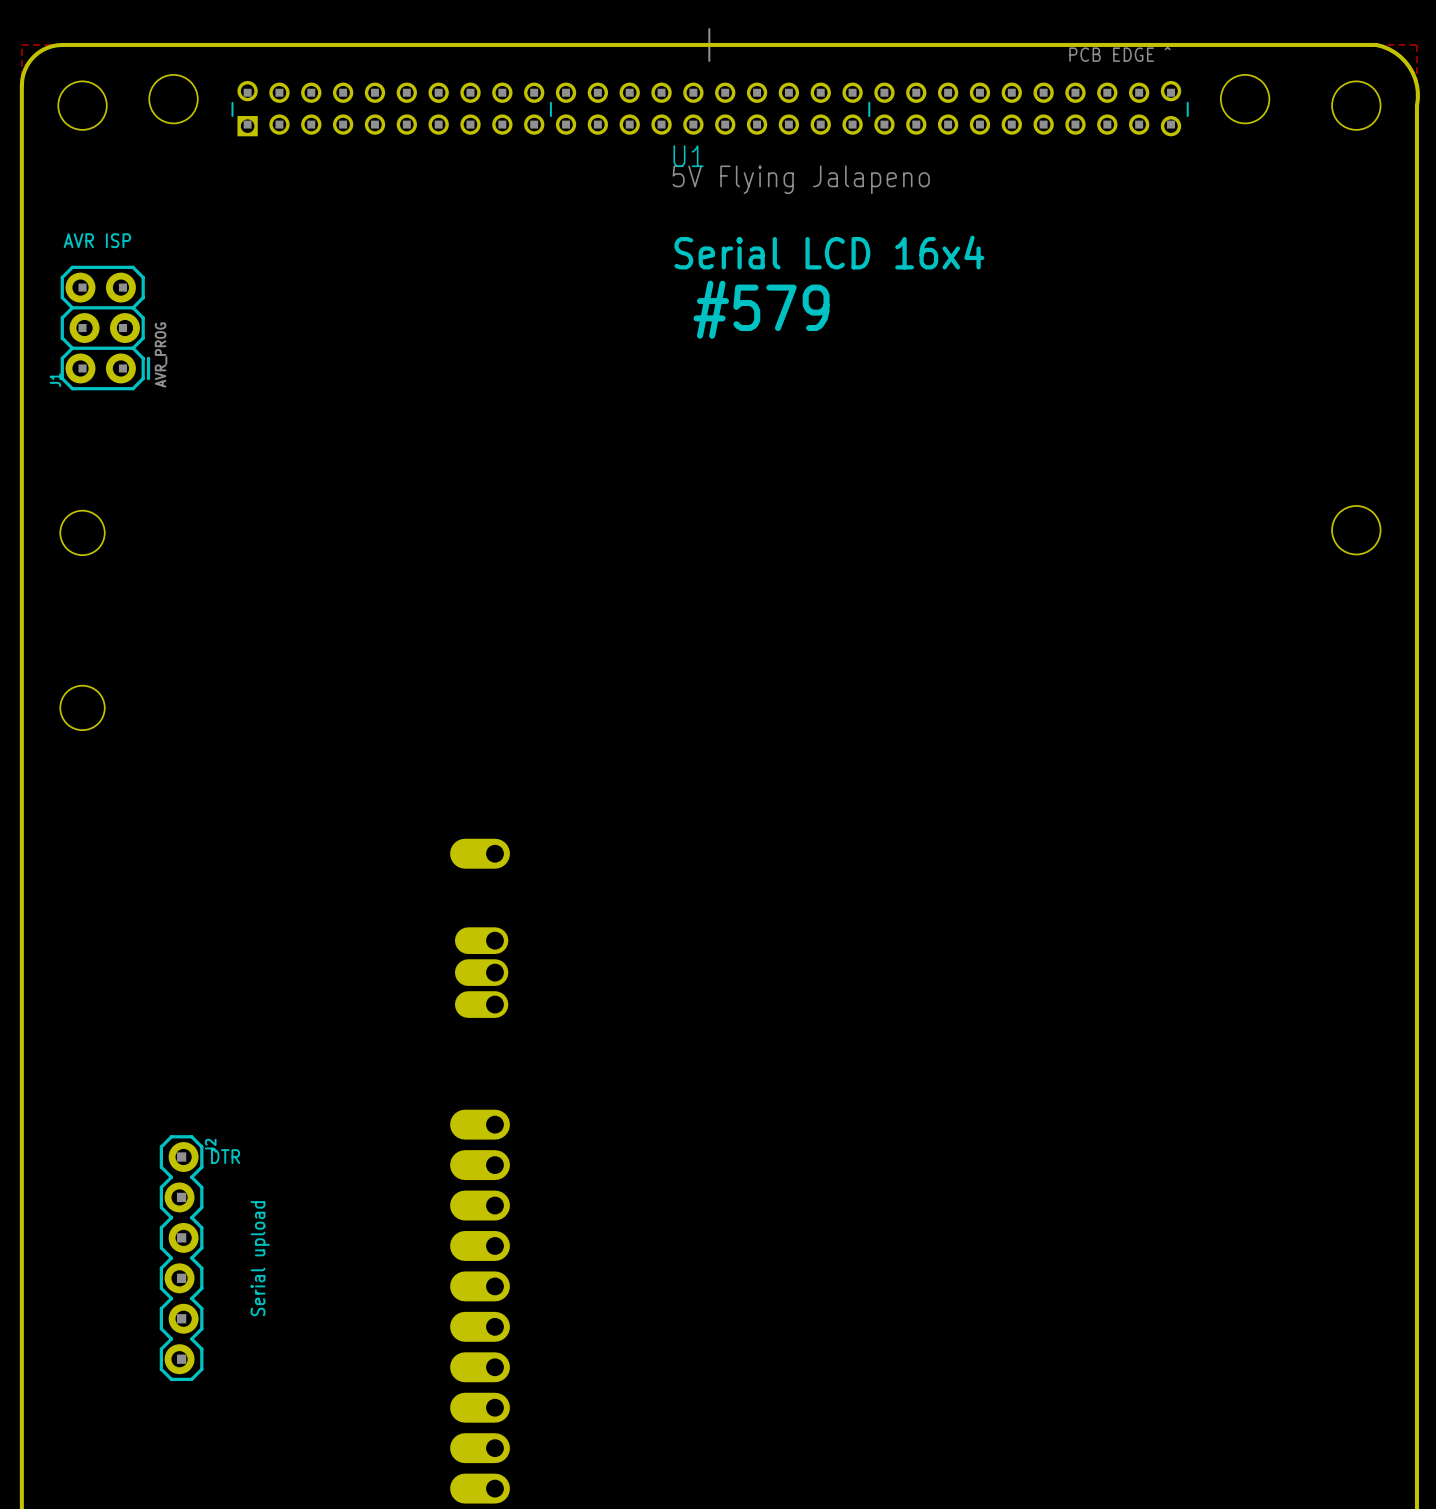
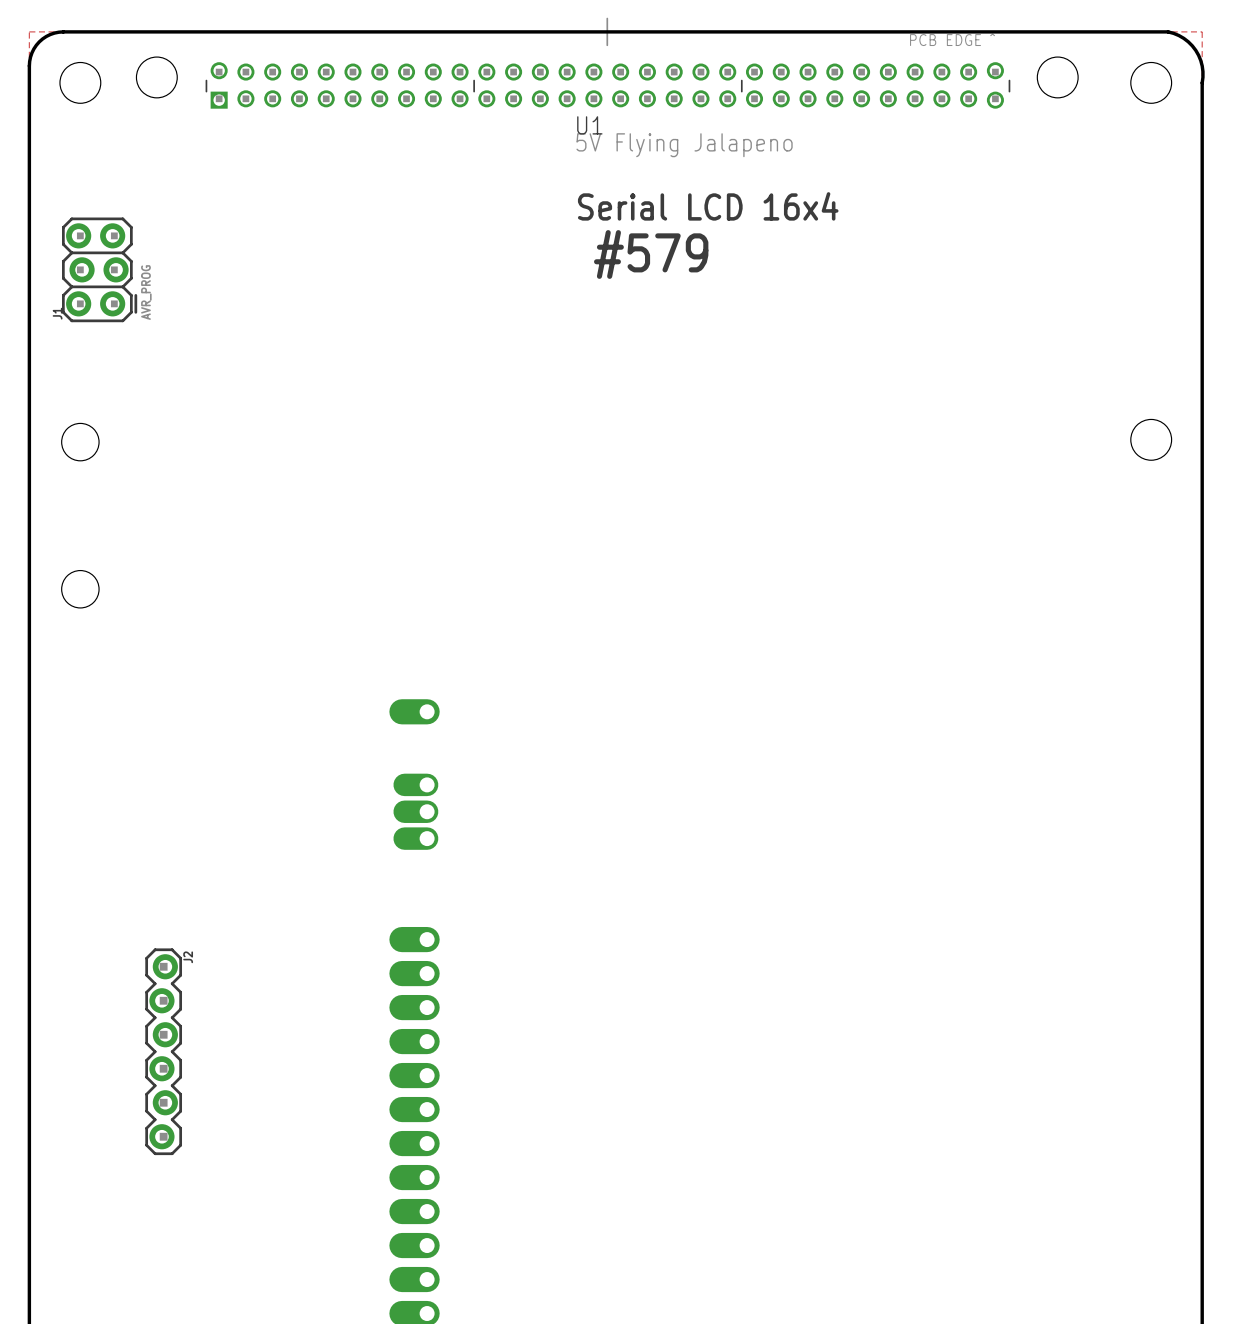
text: AVR ISP (97, 240) -> none
text: DTR (225, 1156) -> none
text: Serial upload (260, 1258) -> none

